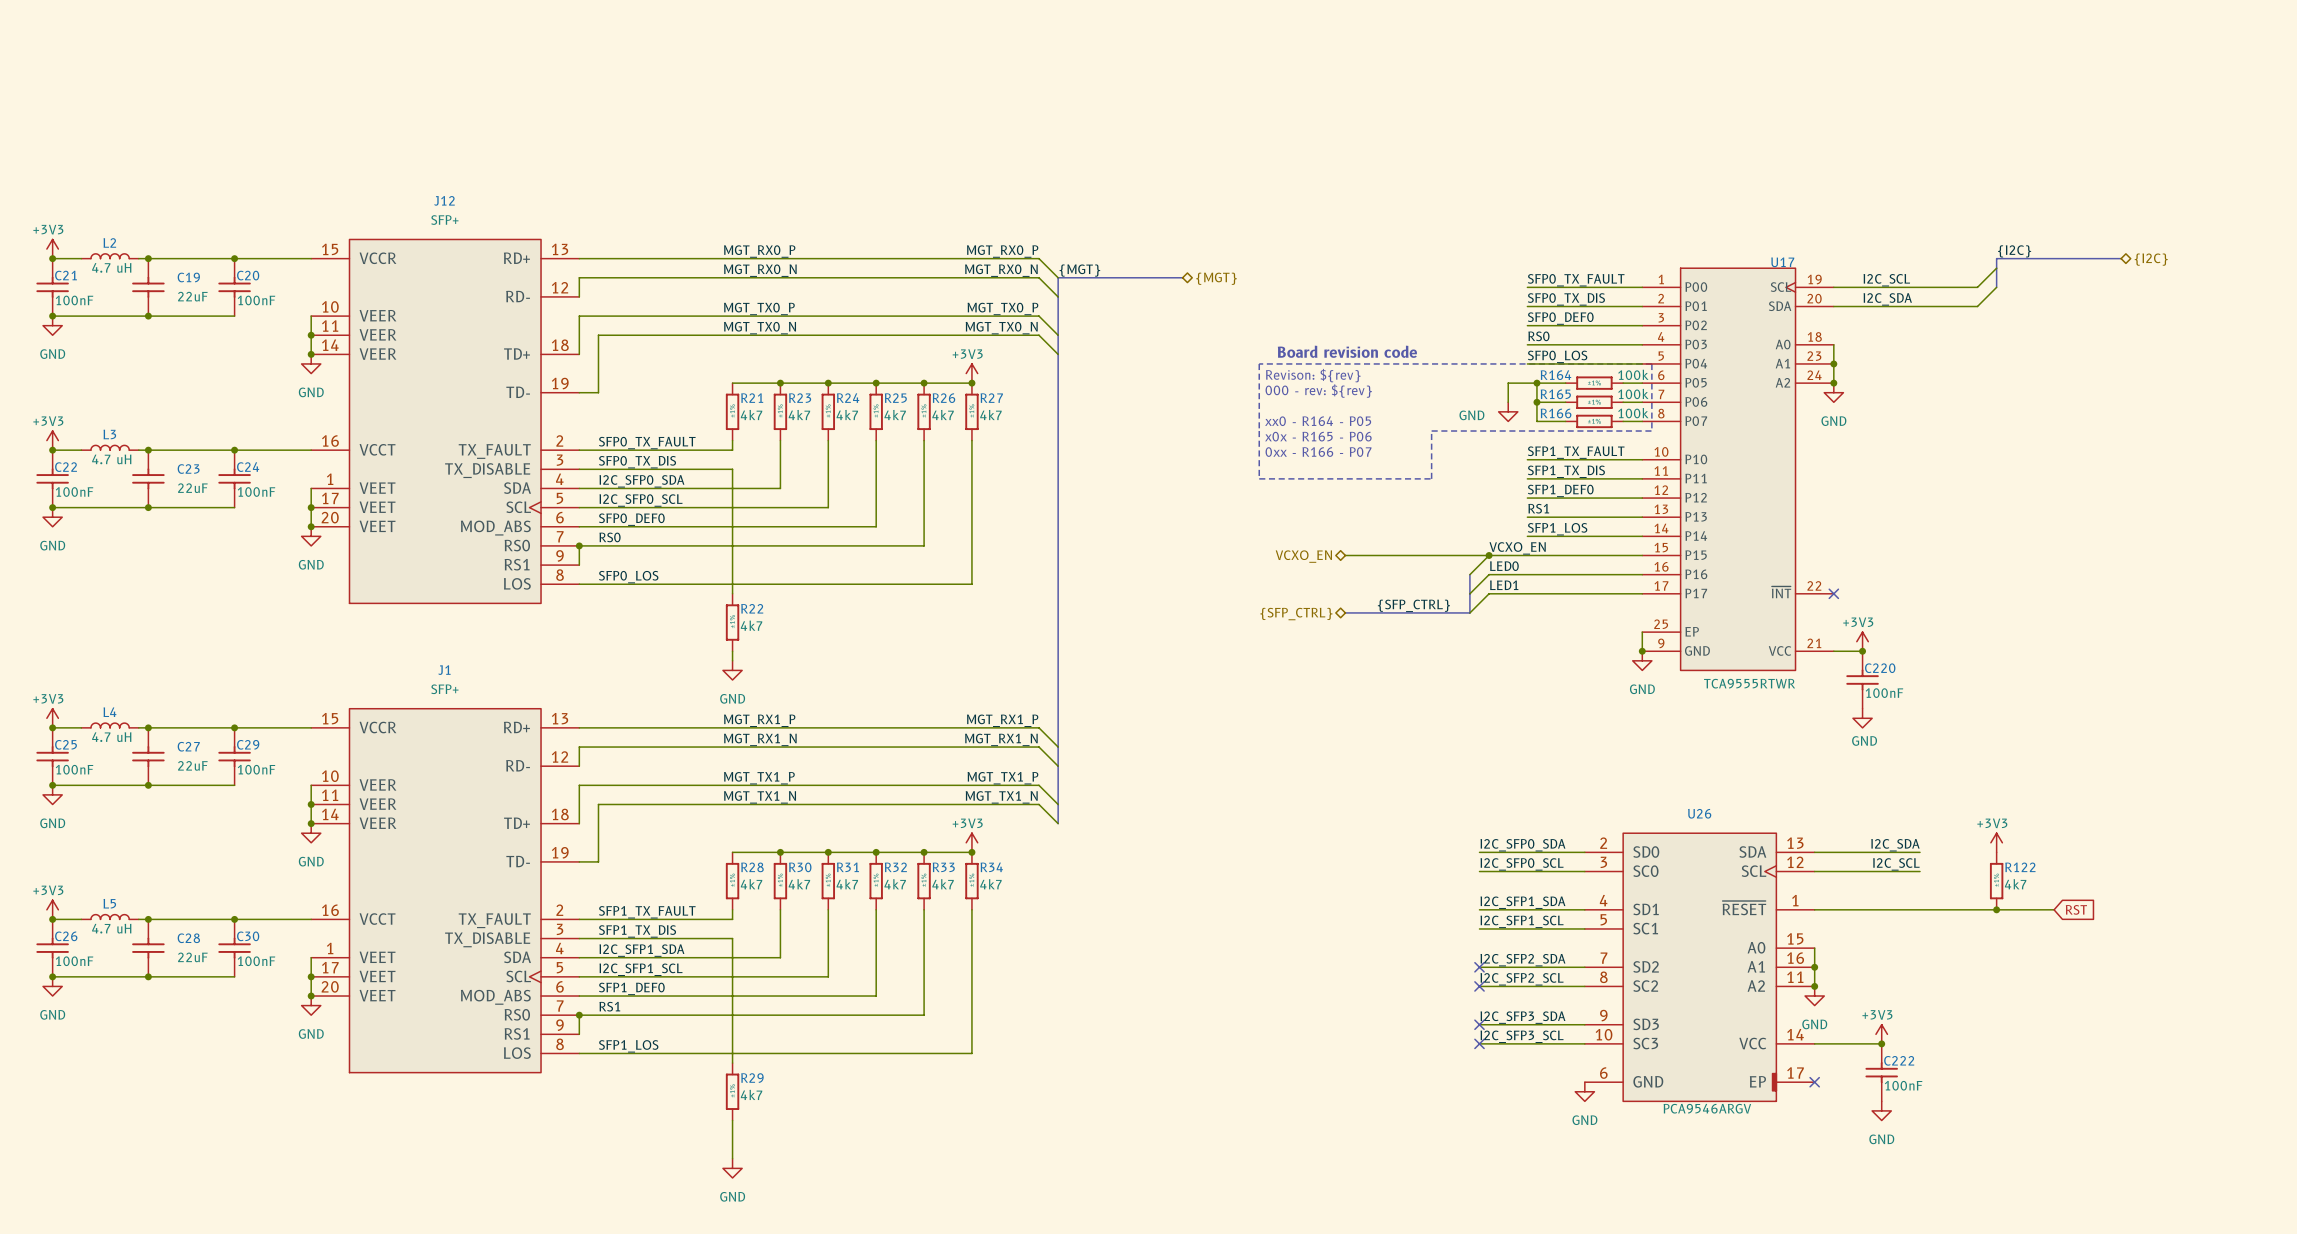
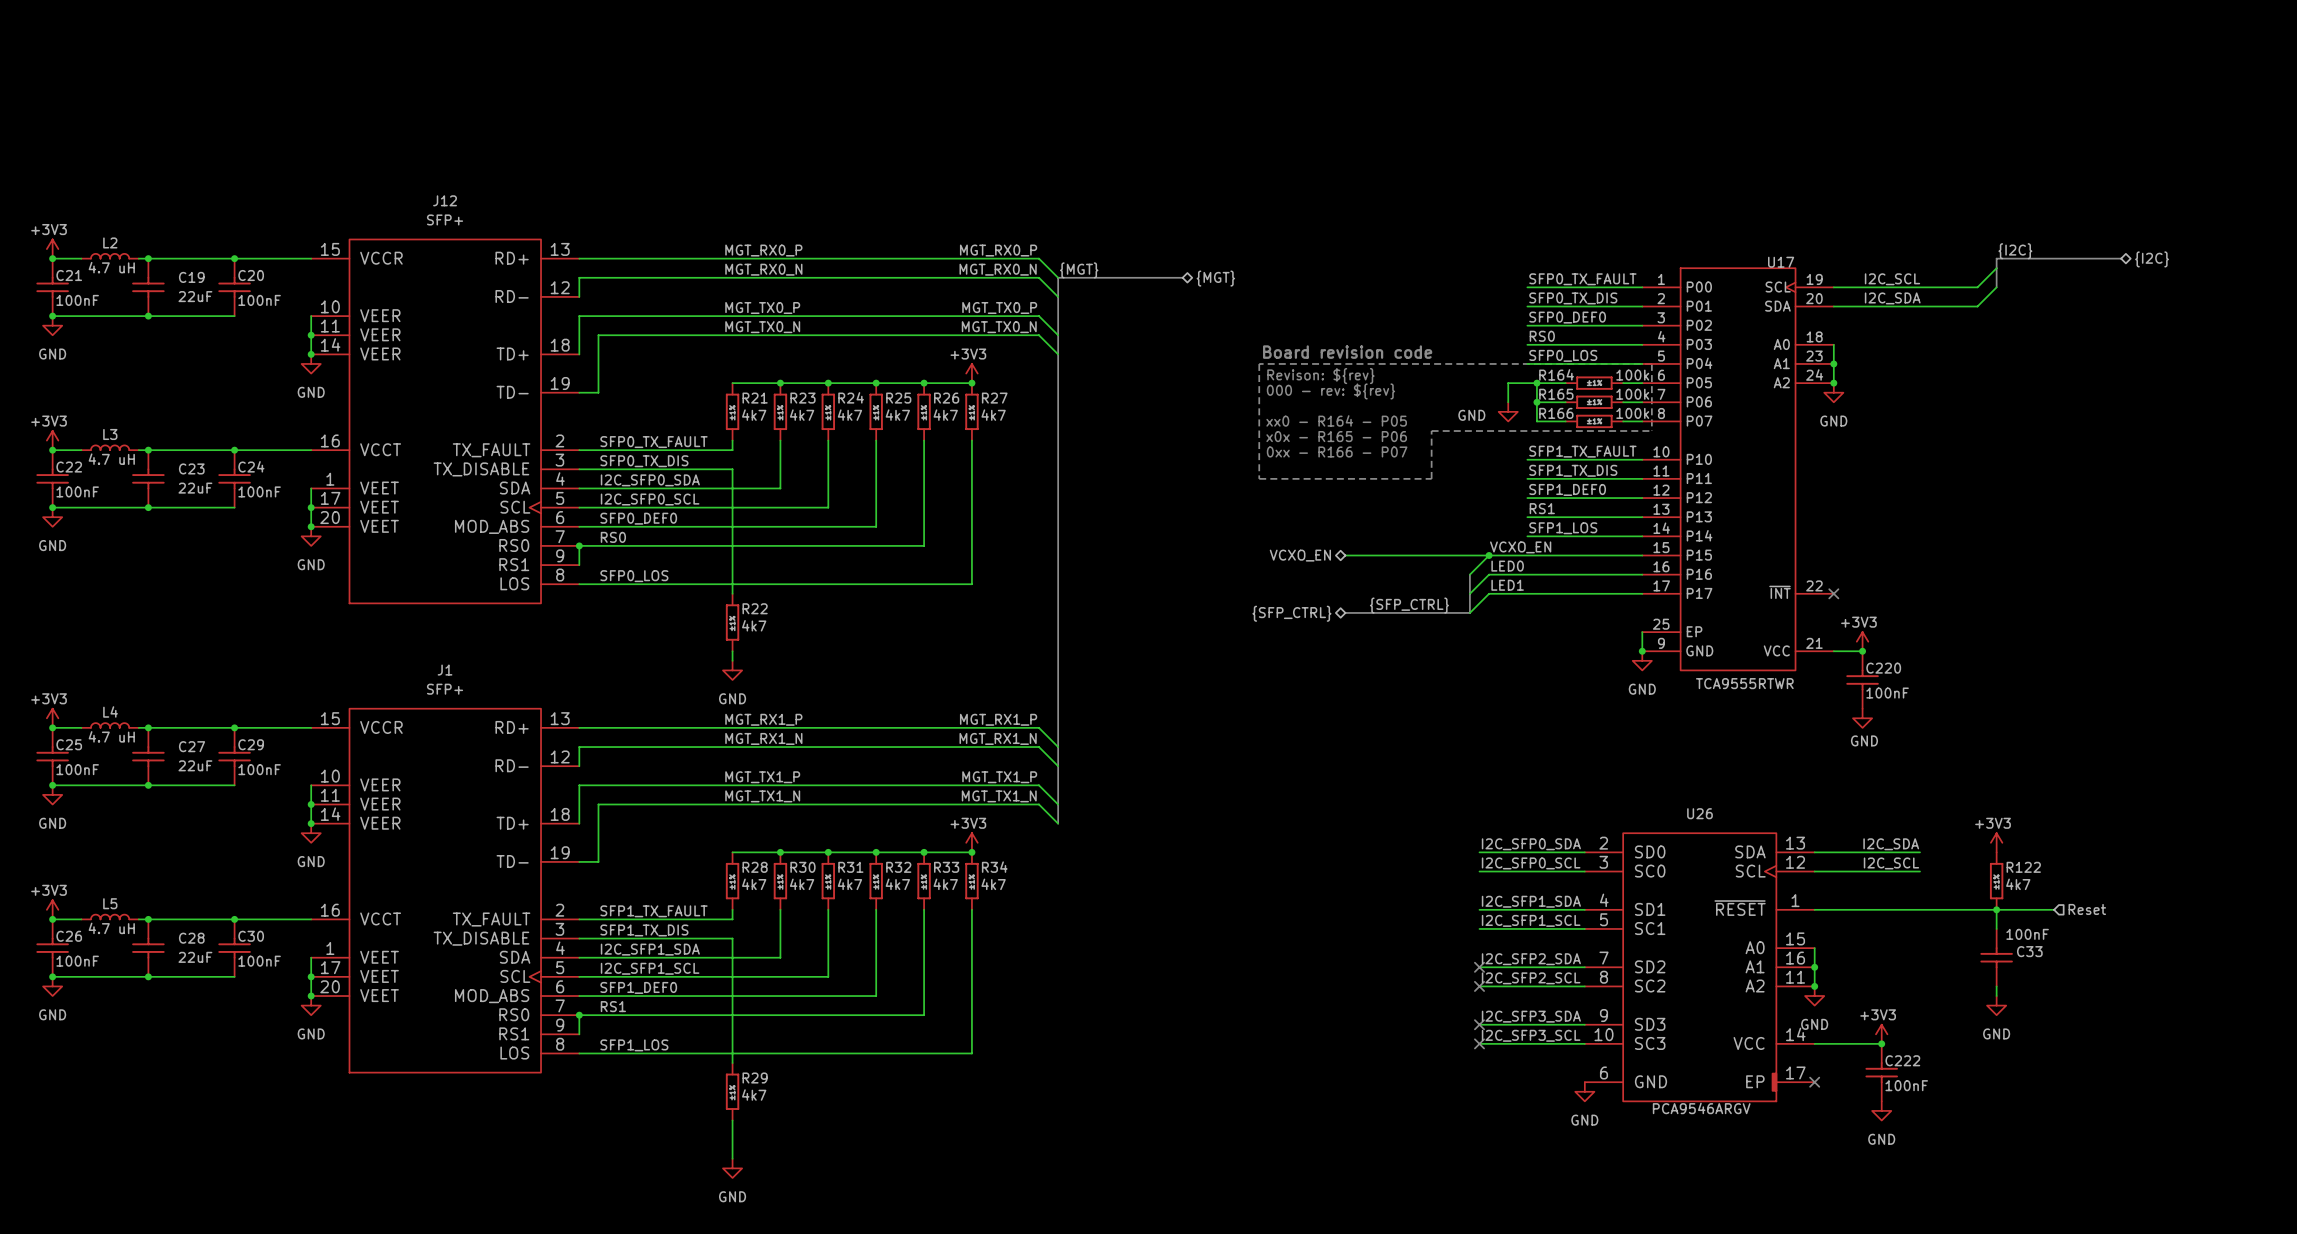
wire: none -> (1996, 909) (1996, 928)
global label: RST (2076, 909) -> none
hierarchical label: none -> Reset (2087, 909)
C33: none -> (1996, 957)
wire: none -> (1996, 986) (1996, 996)
power symbol: none -> GND (1996, 1005)

